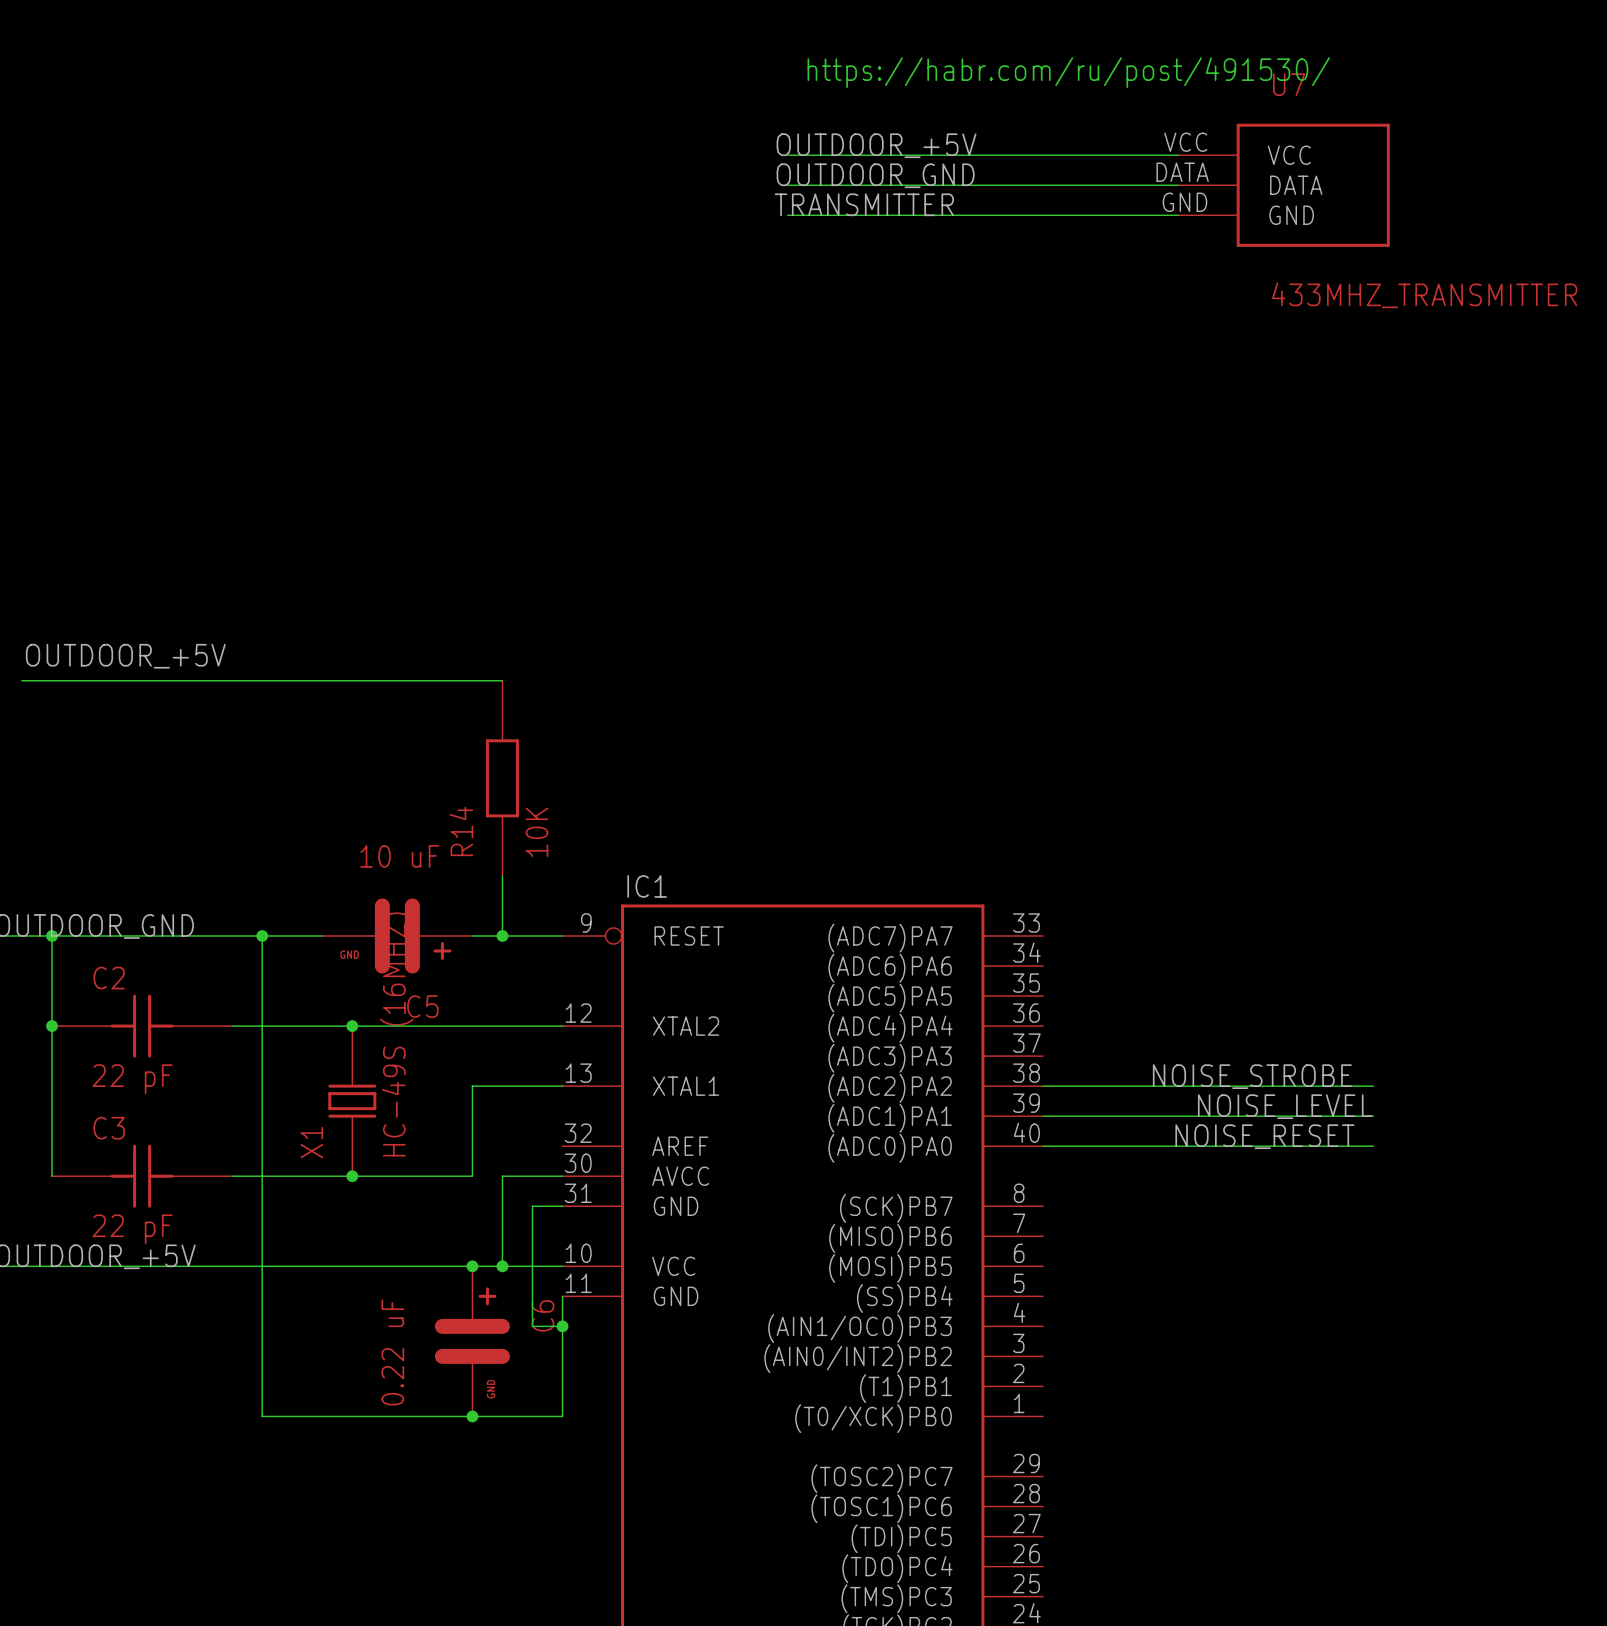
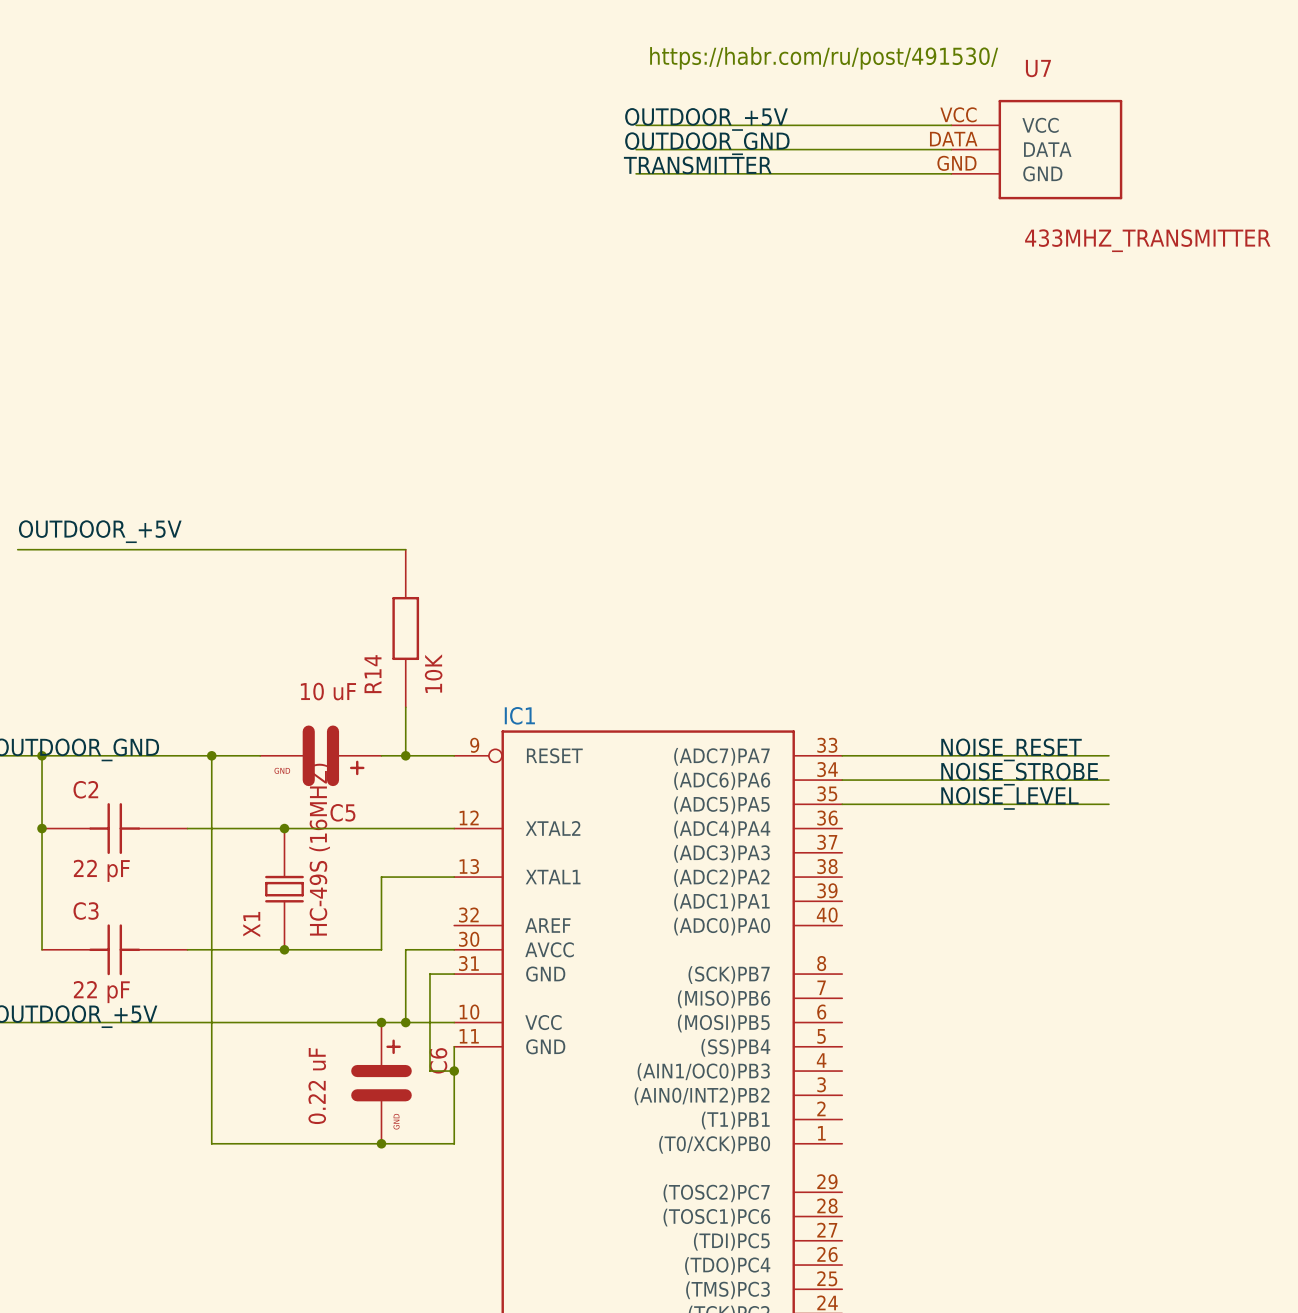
label position: NOISE_STROBE (1252, 1076) -> NOISE_STROBE (1019, 774)
wire: (1042, 1086) (1373, 1086) -> (842, 755) (1108, 755)
label position: NOISE_LEVEL (1285, 1106) -> NOISE_LEVEL (1009, 798)
wire: (1042, 1116) (1373, 1116) -> (842, 780) (1108, 780)
label position: NOISE_RESET (1264, 1136) -> NOISE_RESET (1011, 749)
wire: (1042, 1146) (1373, 1146) -> (842, 804) (1108, 804)

